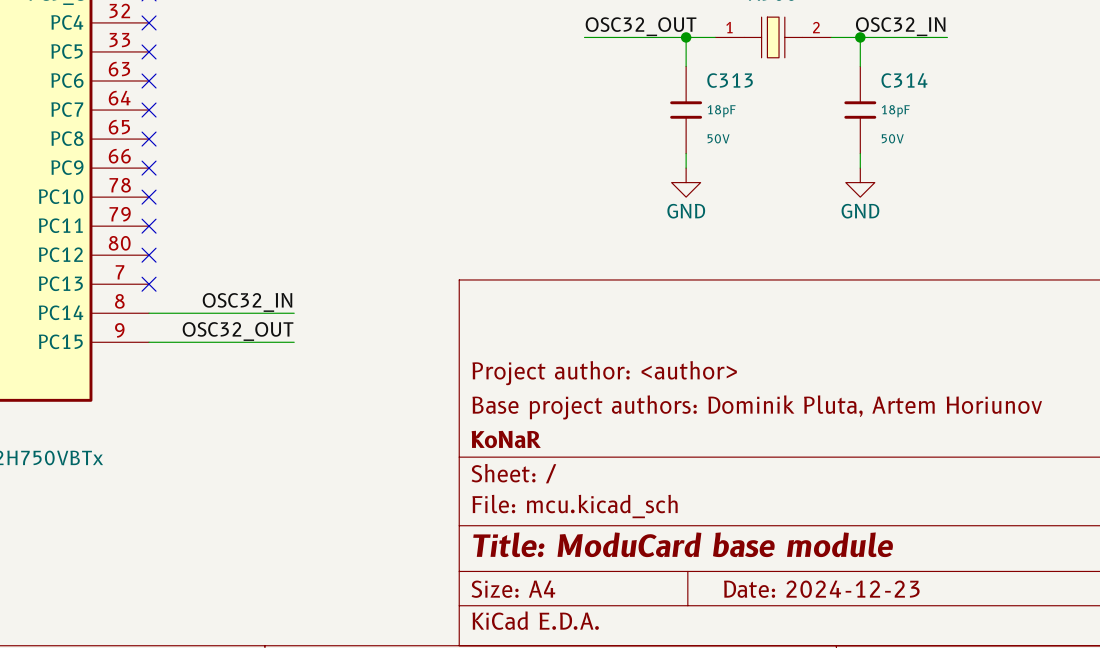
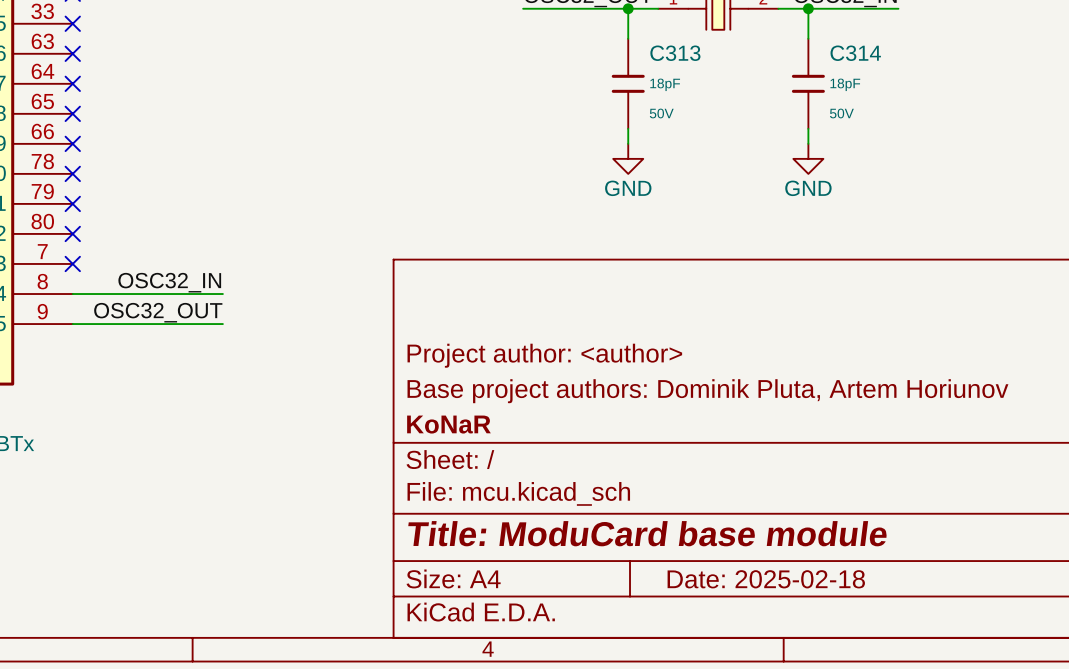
title block: Date: 2024-12-23 (821, 589) -> Date: 2025-02-18 (766, 579)

